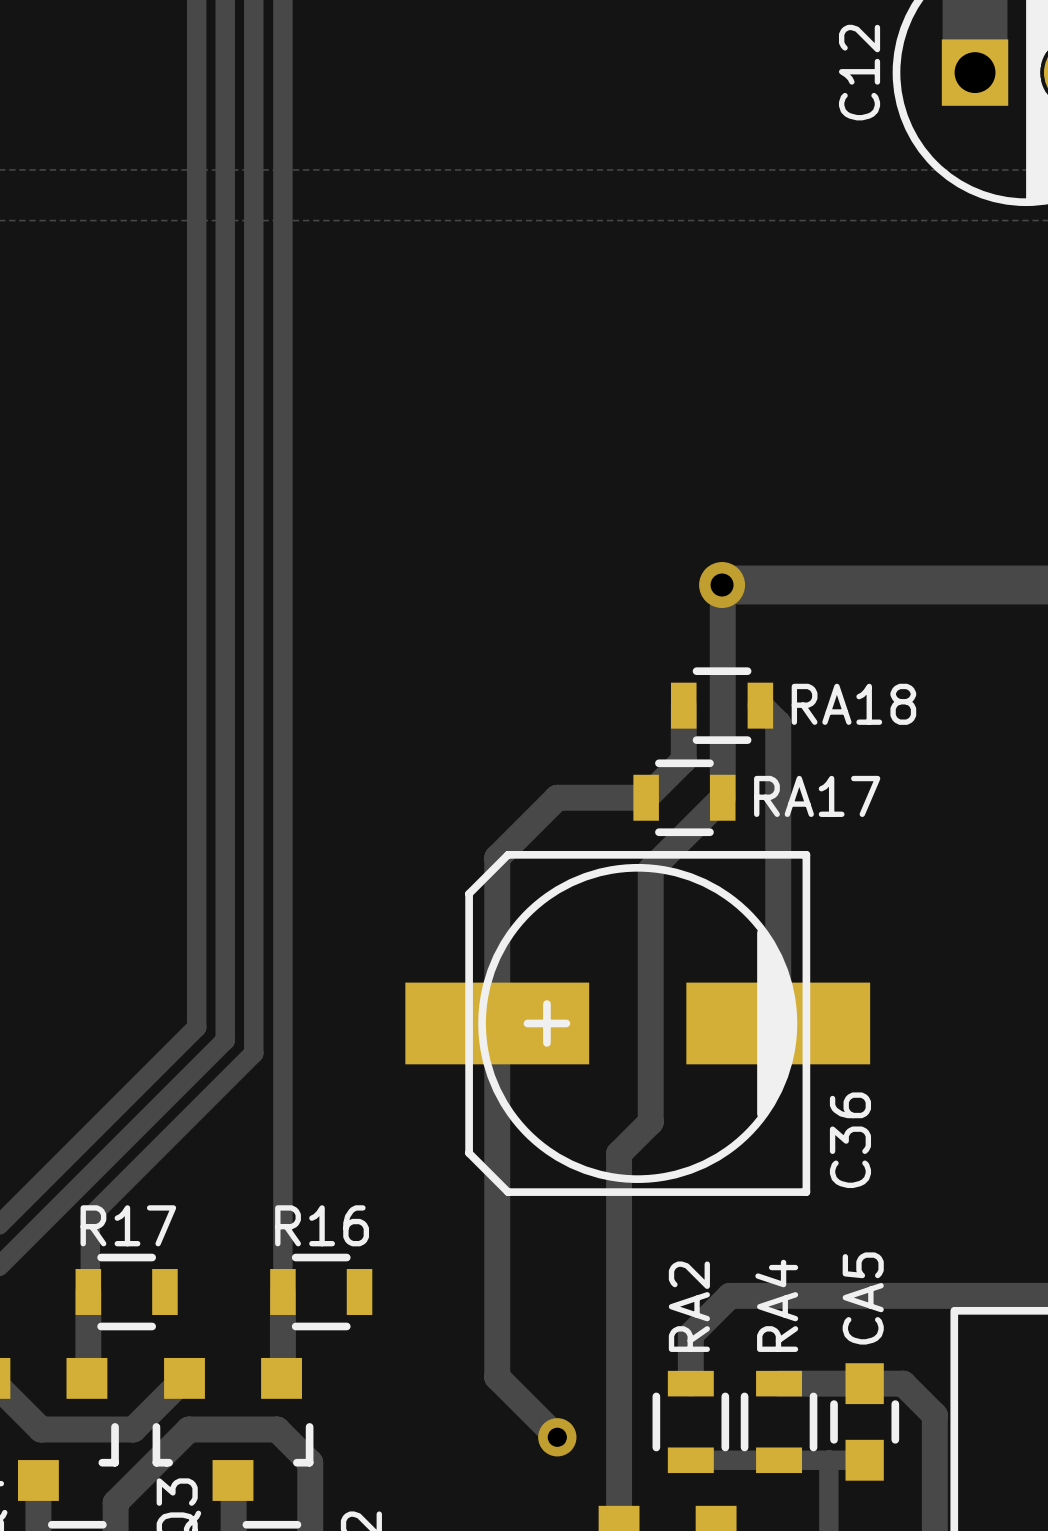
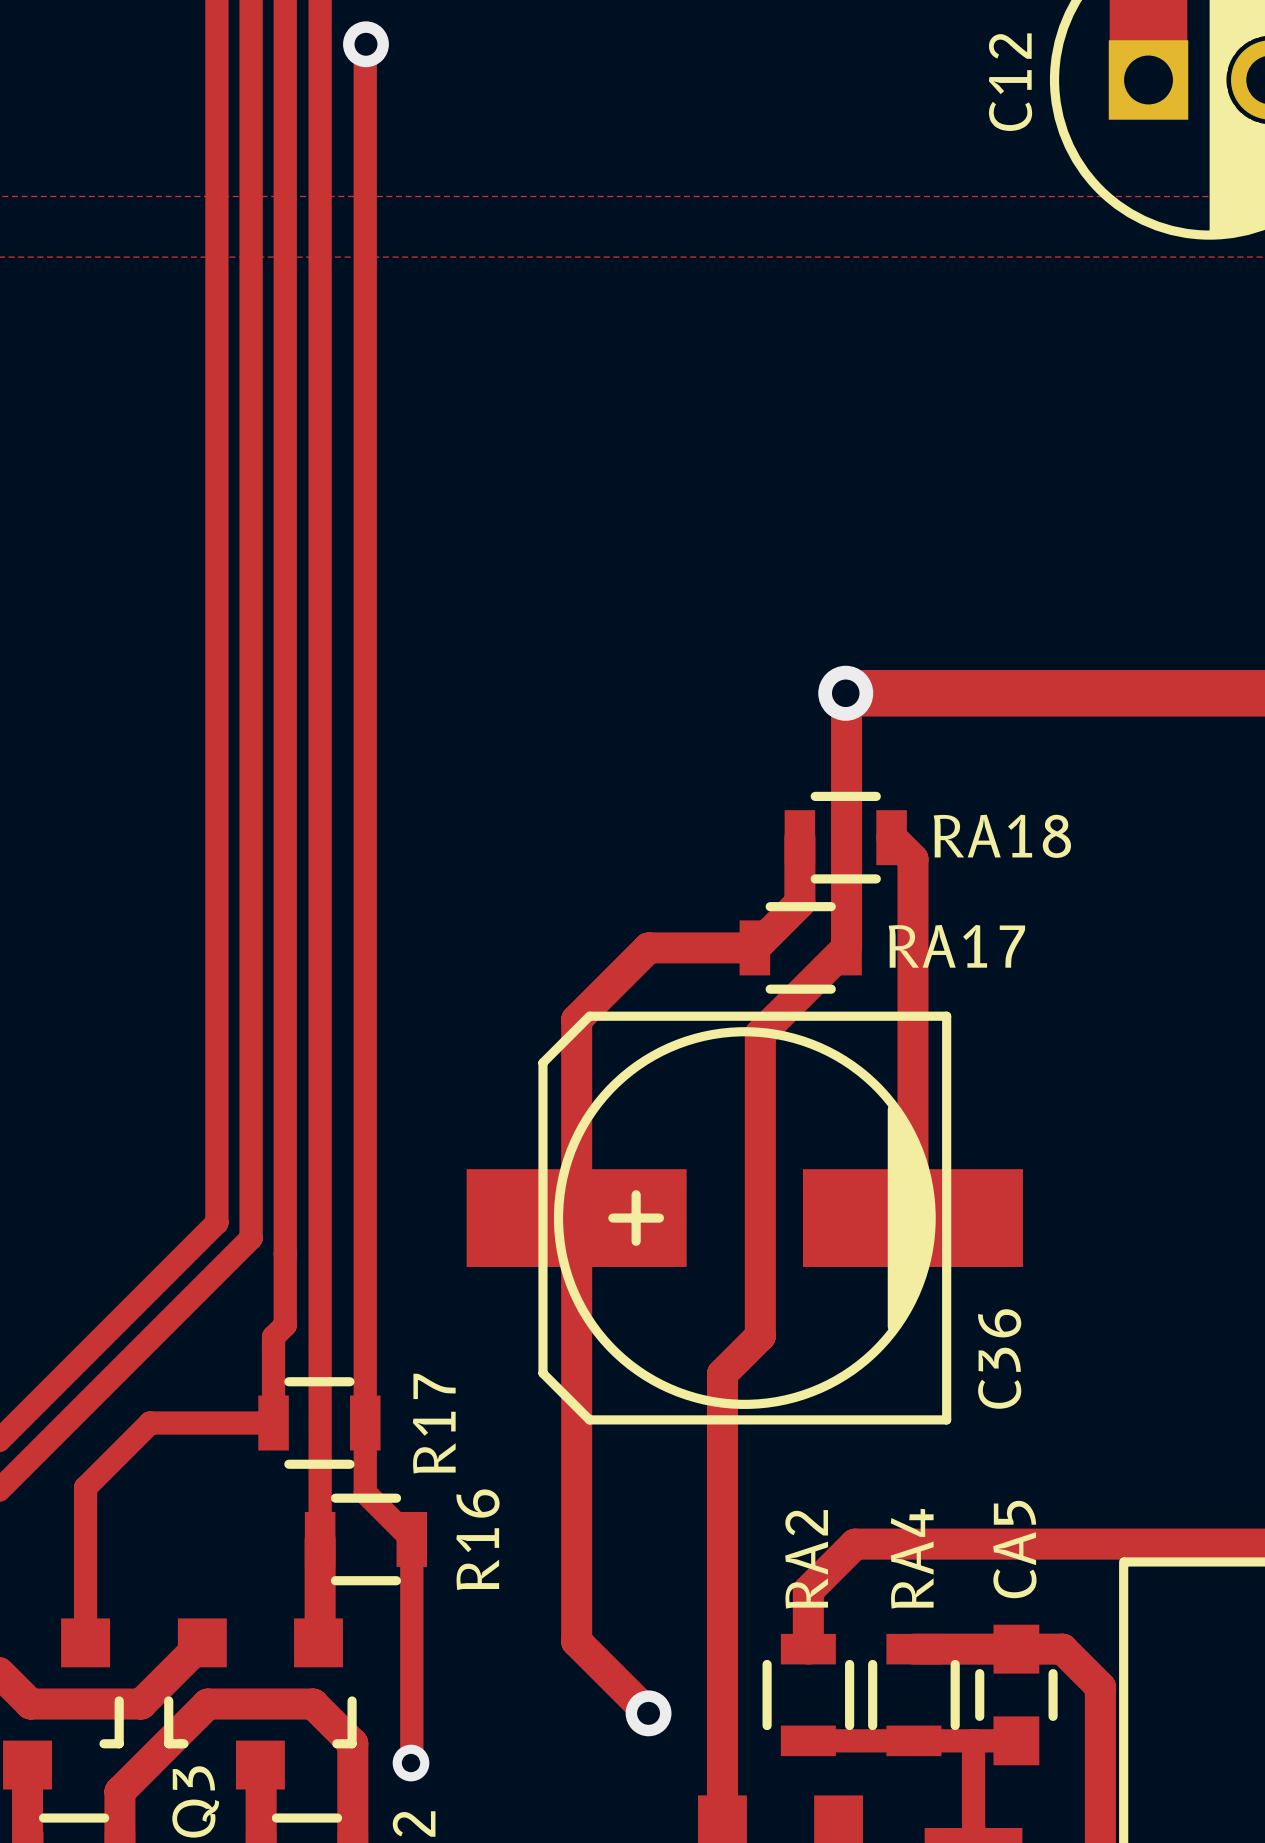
via: none -> (365, 44)
track: none -> (365, 45) (365, 1492) (411, 1539) (411, 1762)
track: (253, 1053) (90, 1216) (88, 1377) -> (285, 1253) (285, 1325) (273, 1336) (273, 1423) (150, 1423) (85, 1487) (85, 1642)
R17 name rotation: 0° (128, 1225) -> 90° counterclockwise (434, 1423)
R16 name rotation: 0° (322, 1225) -> 90° counterclockwise (477, 1539)
R17 position: (126, 1292) -> (319, 1423)
via: none -> (411, 1763)

